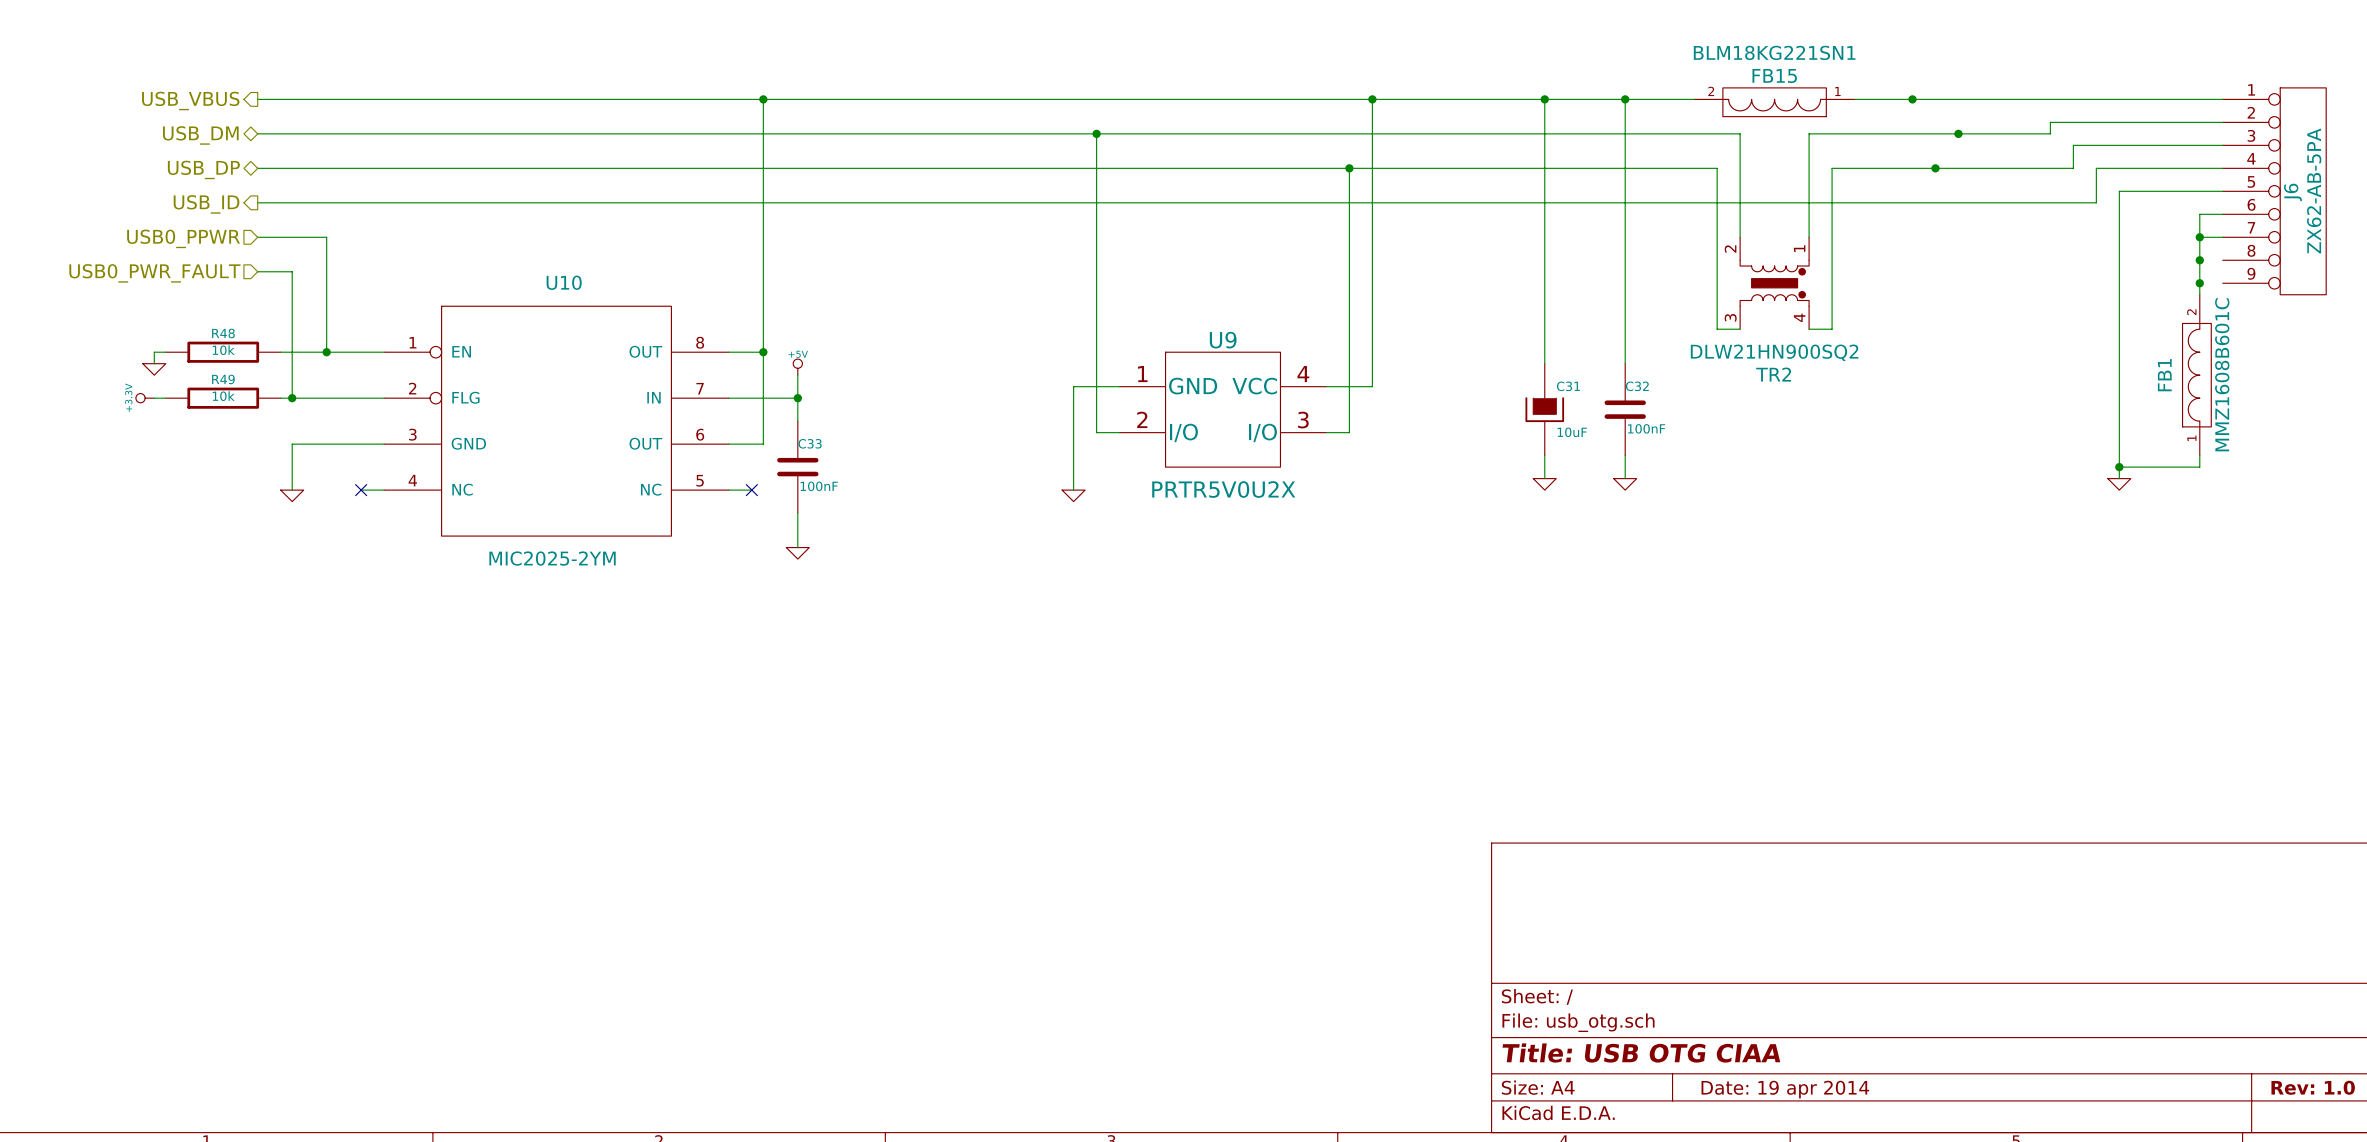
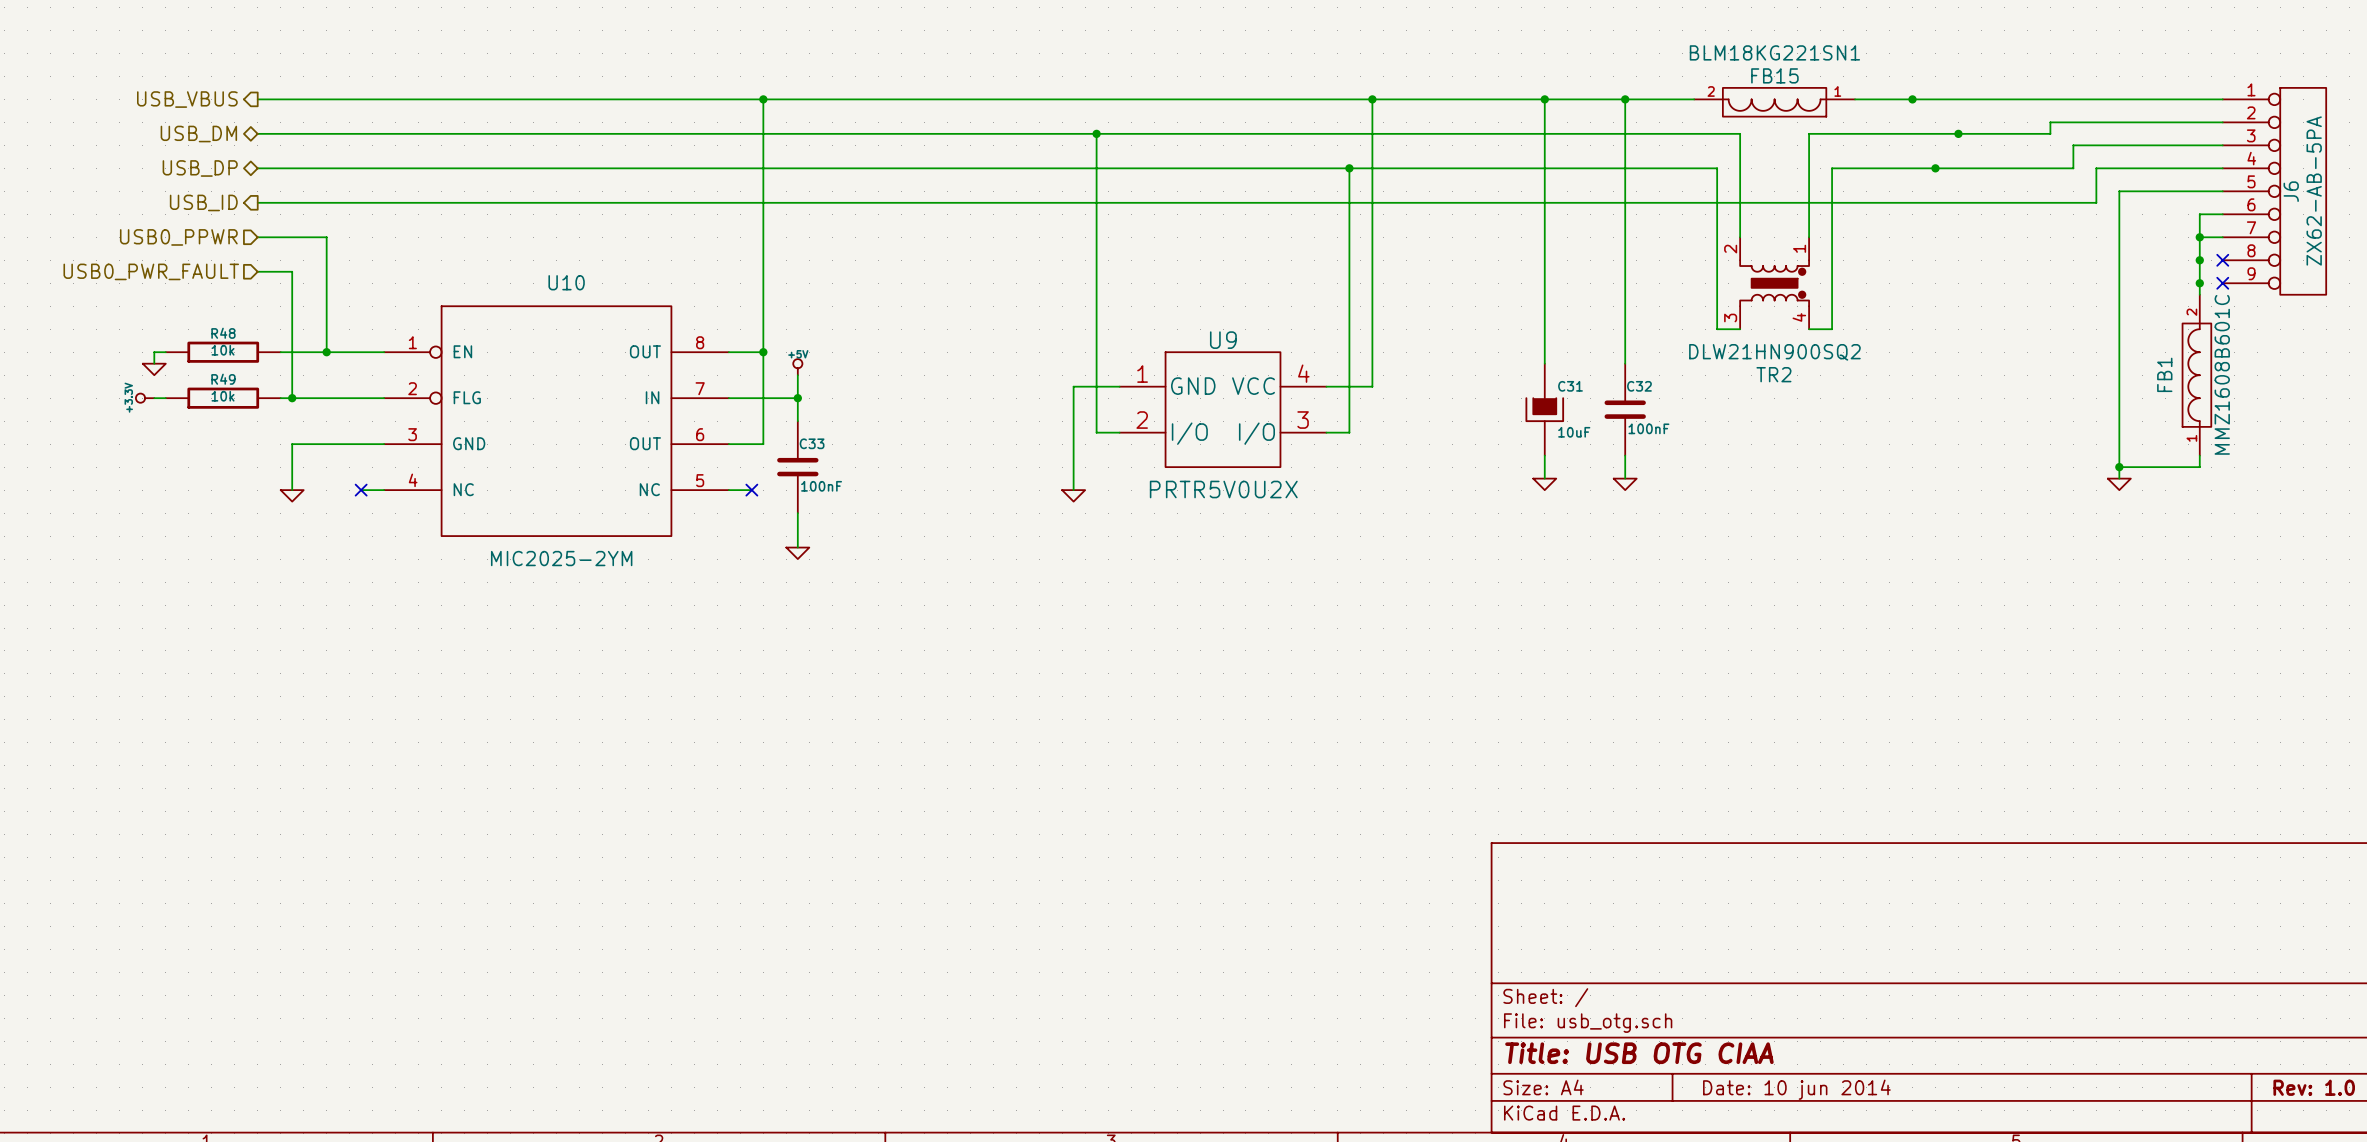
no-connect mark: none -> (2222, 260)
no-connect mark: none -> (2222, 283)
title block: Date: 19 apr 2014 (1785, 1089) -> Date: 10 jun 2014 (1796, 1089)

